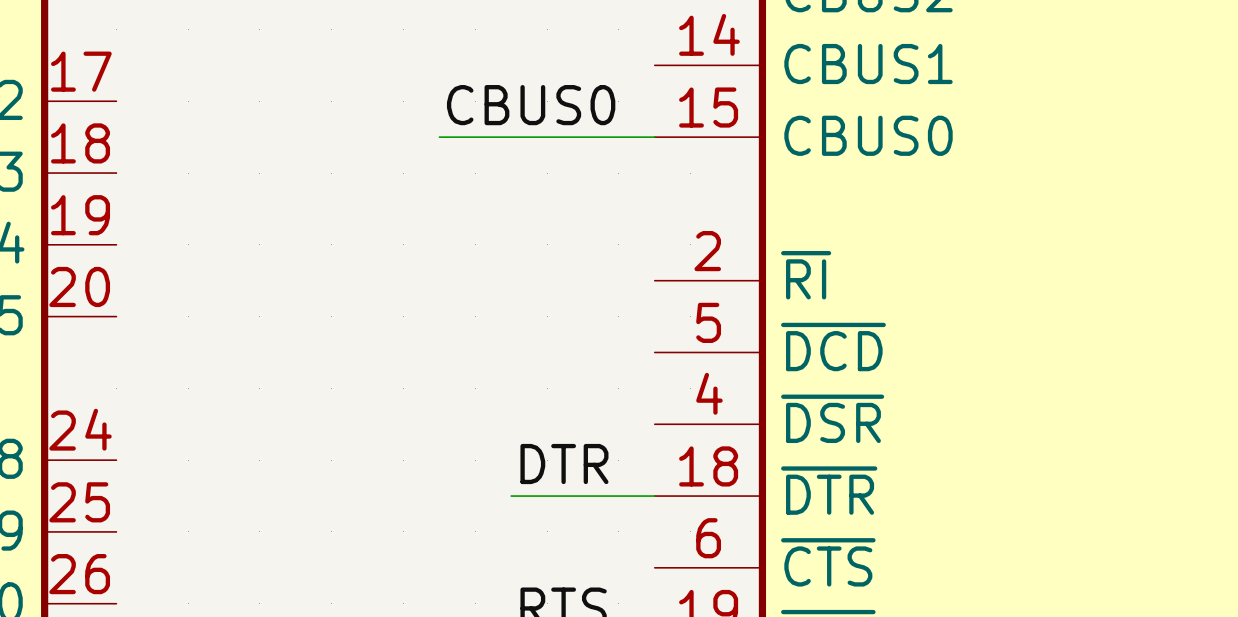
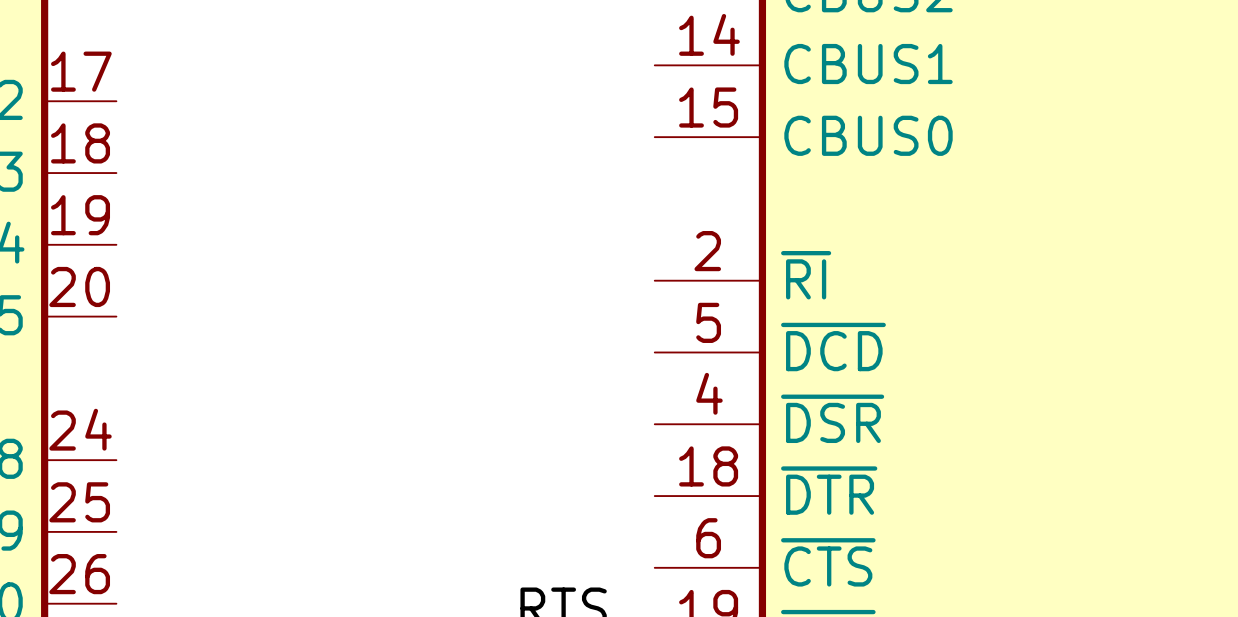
label: CBUS0 (531, 105) -> none
wire: (439, 137) (654, 137) -> none
label: DTR (564, 464) -> none
wire: (511, 496) (654, 496) -> none

